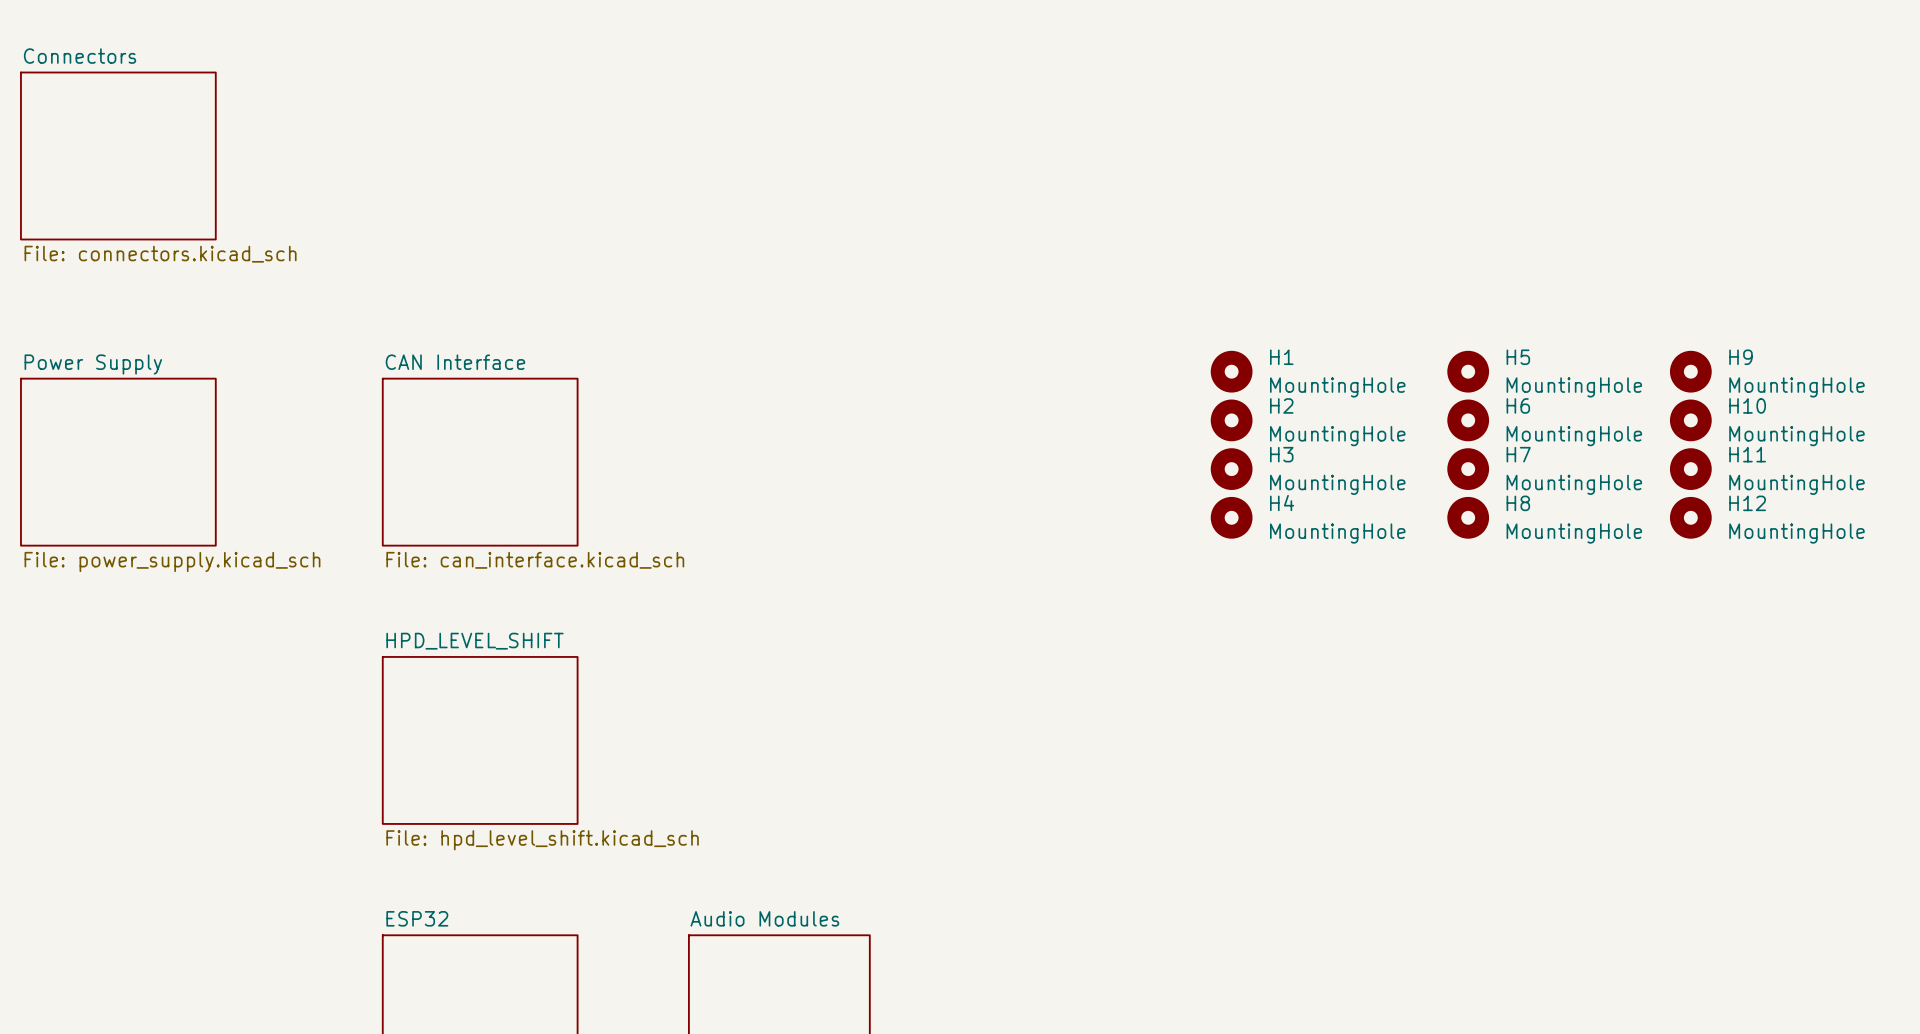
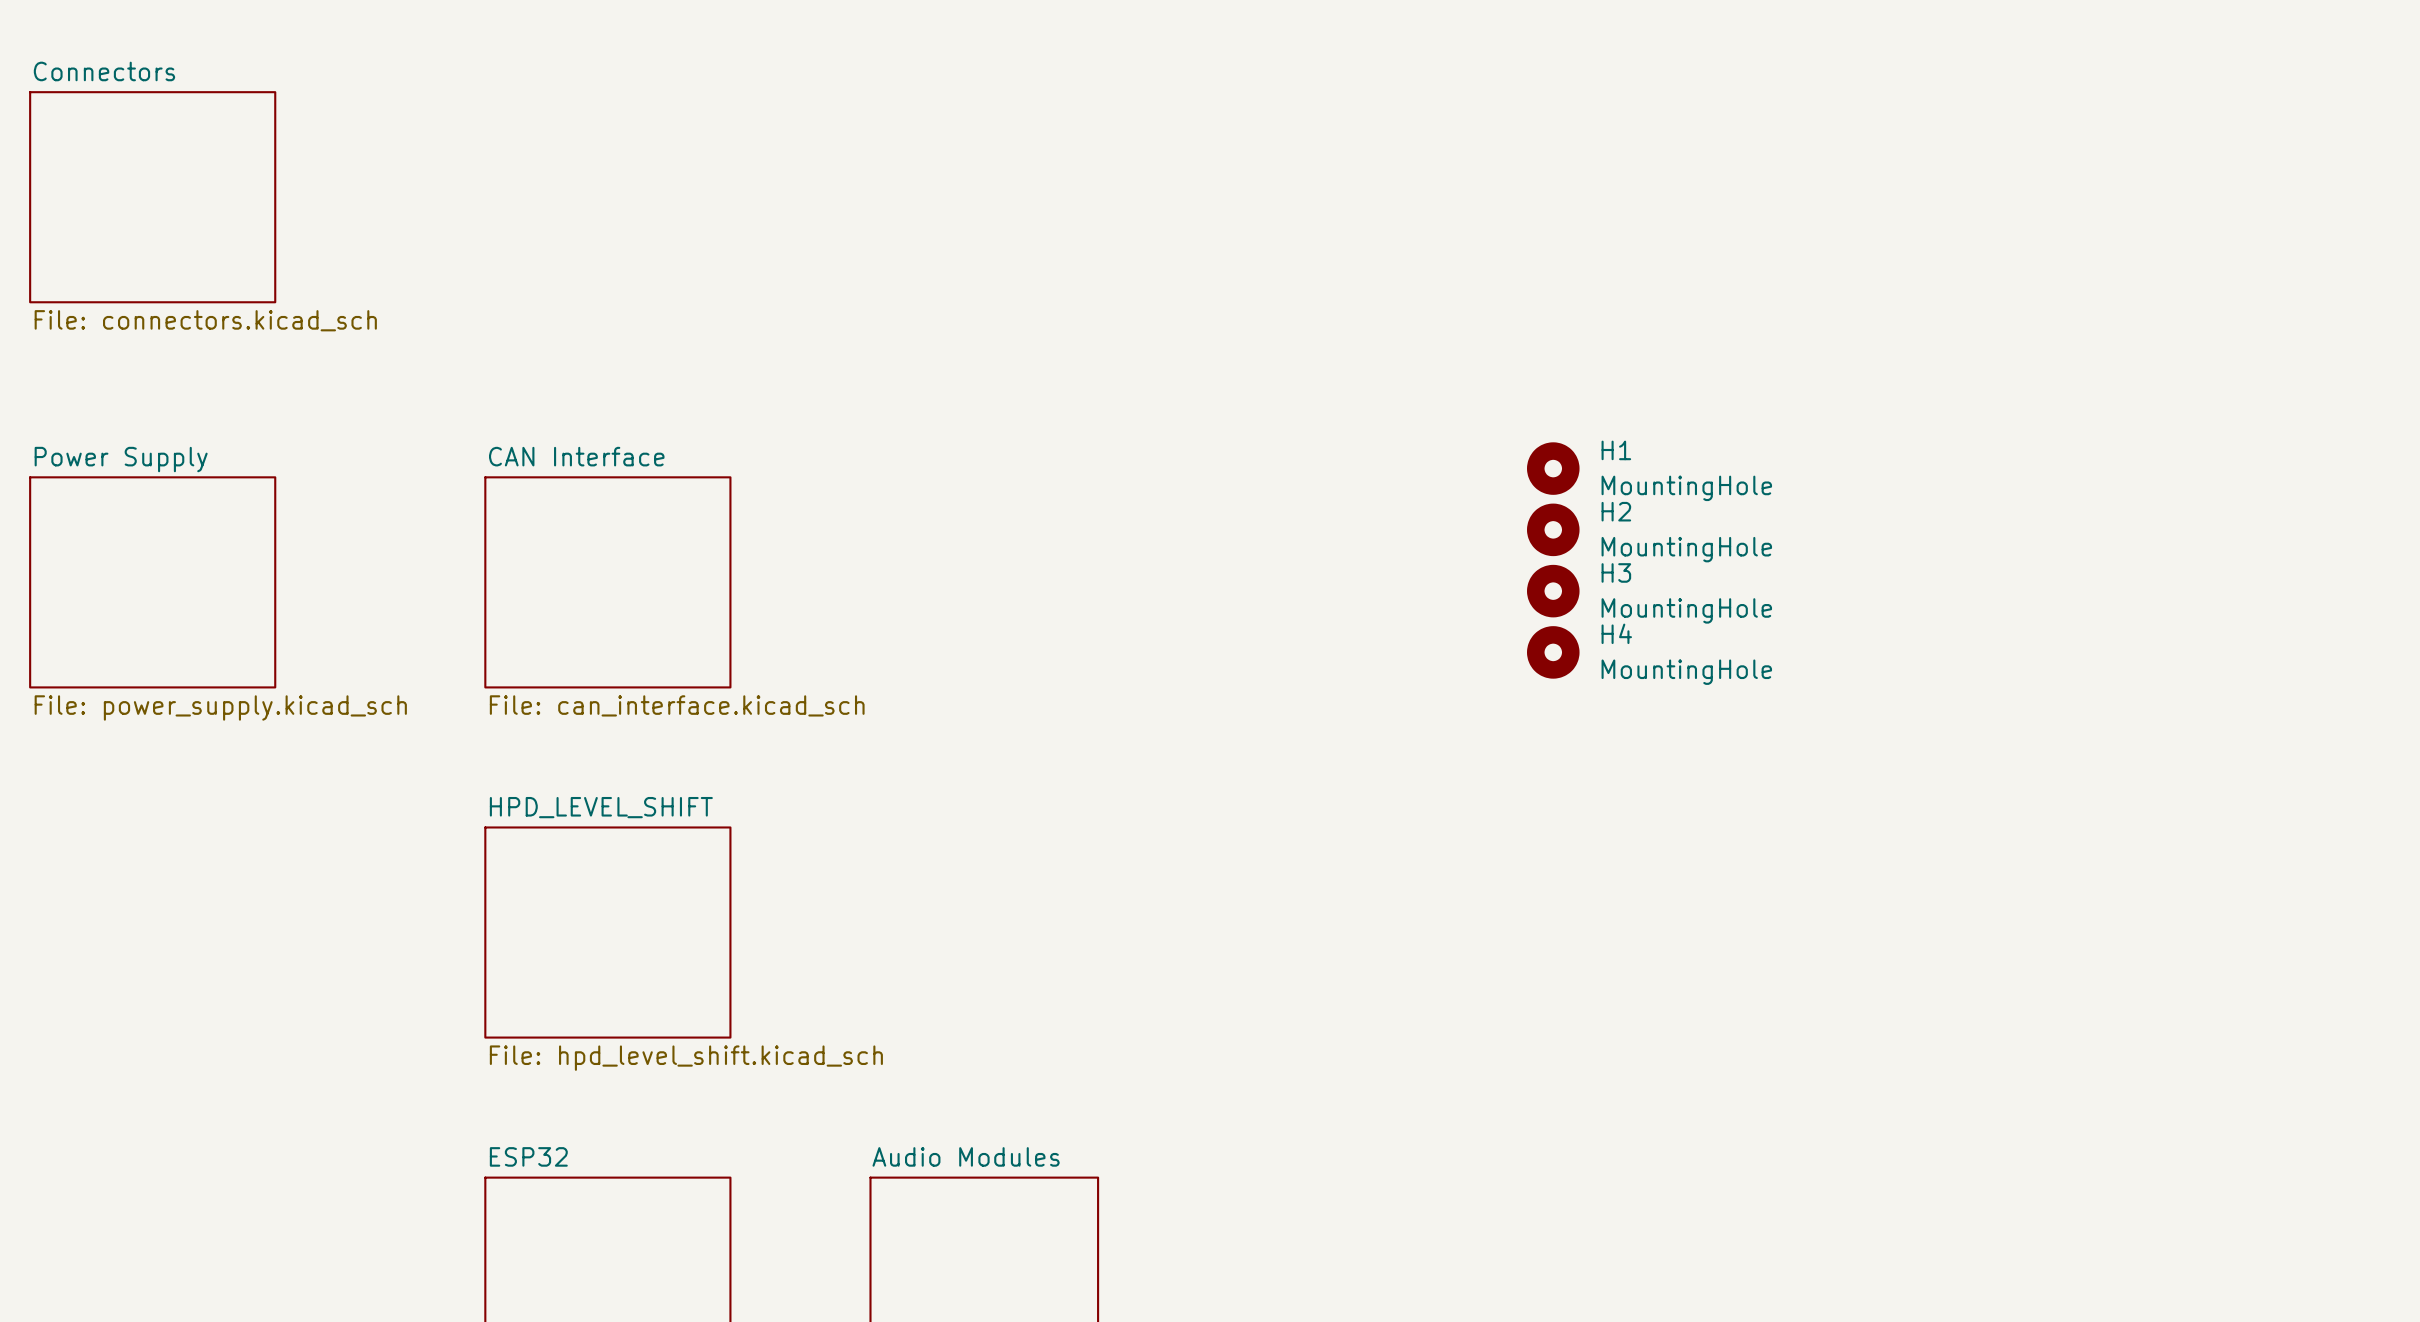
H5: MountingHole (1468, 371) -> none
H9: MountingHole (1690, 371) -> none
H6: MountingHole (1468, 420) -> none
H10: MountingHole (1690, 420) -> none
H7: MountingHole (1468, 469) -> none
H11: MountingHole (1690, 469) -> none
H8: MountingHole (1468, 517) -> none
H12: MountingHole (1690, 517) -> none

